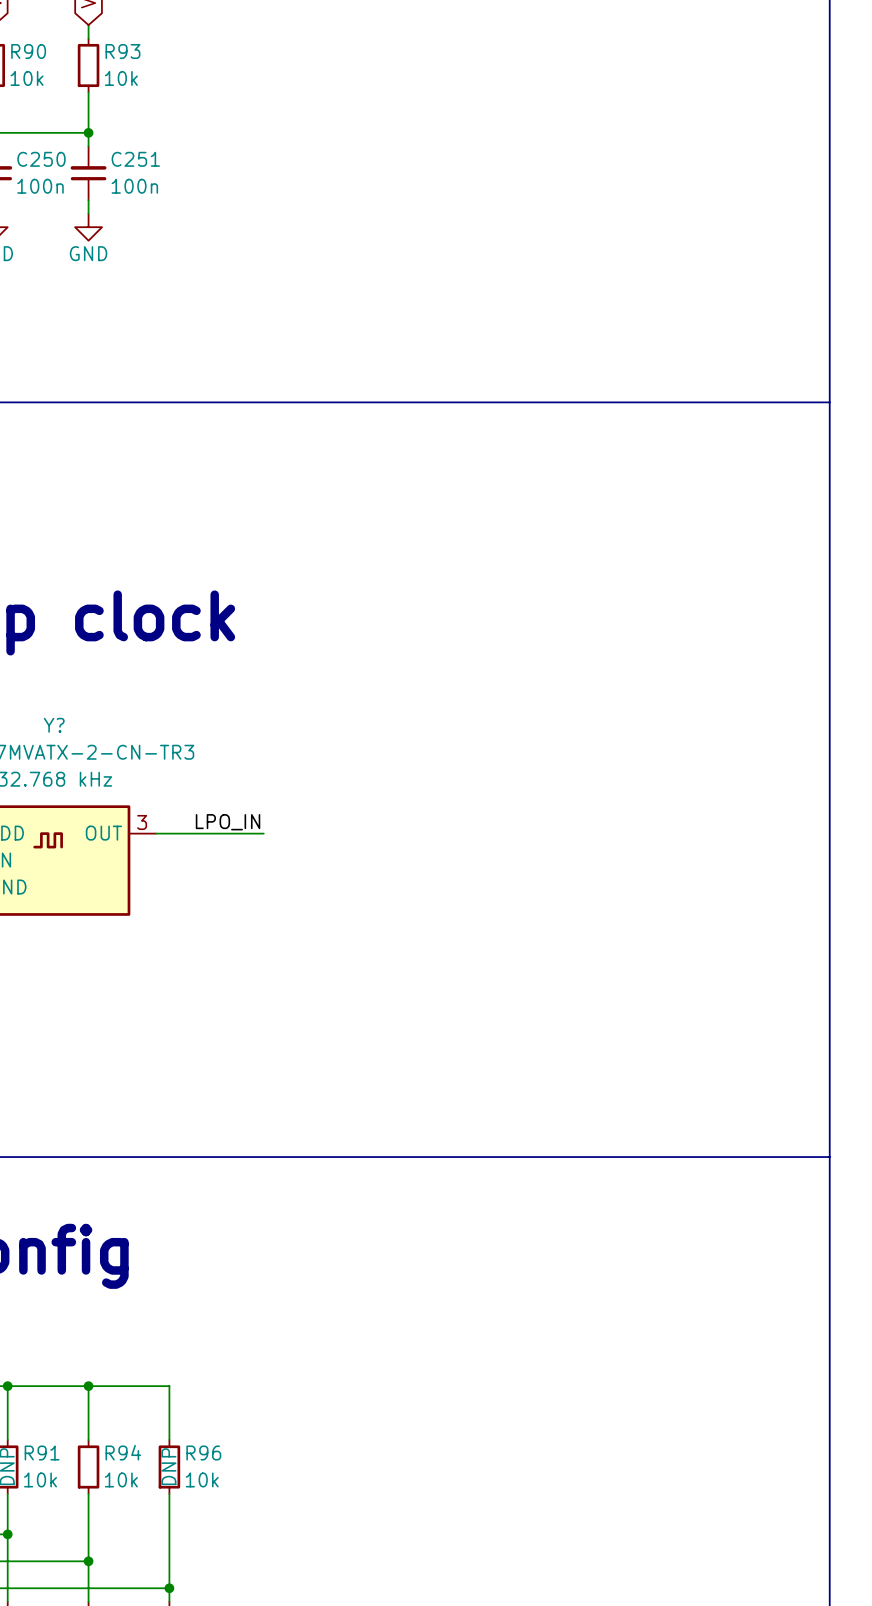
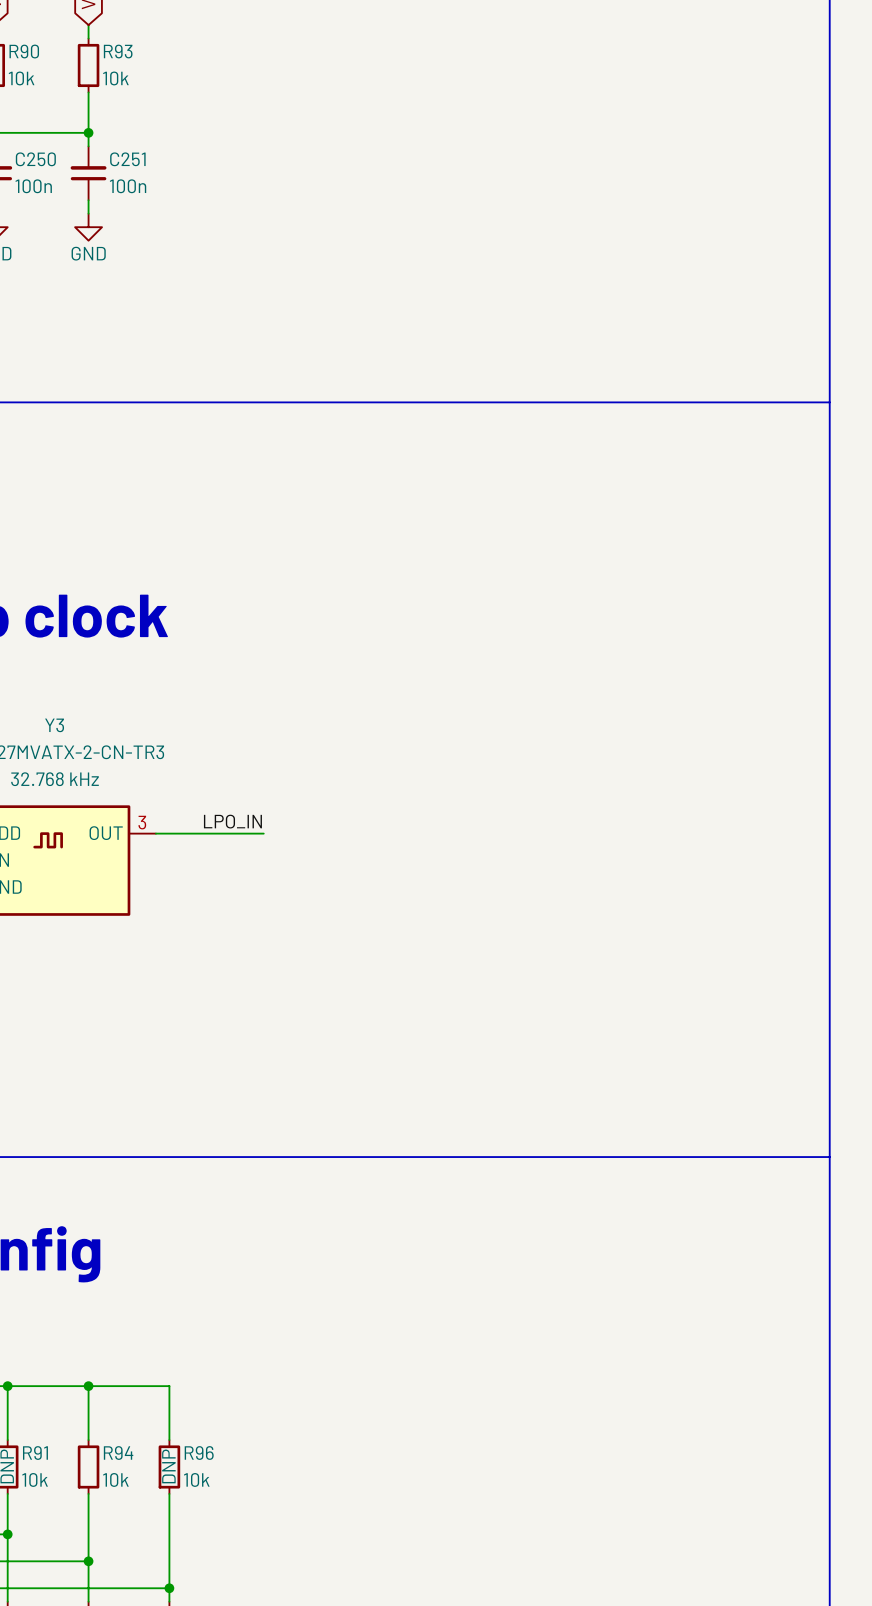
Y? name: Y? (54, 725) -> Y3 (54, 725)

